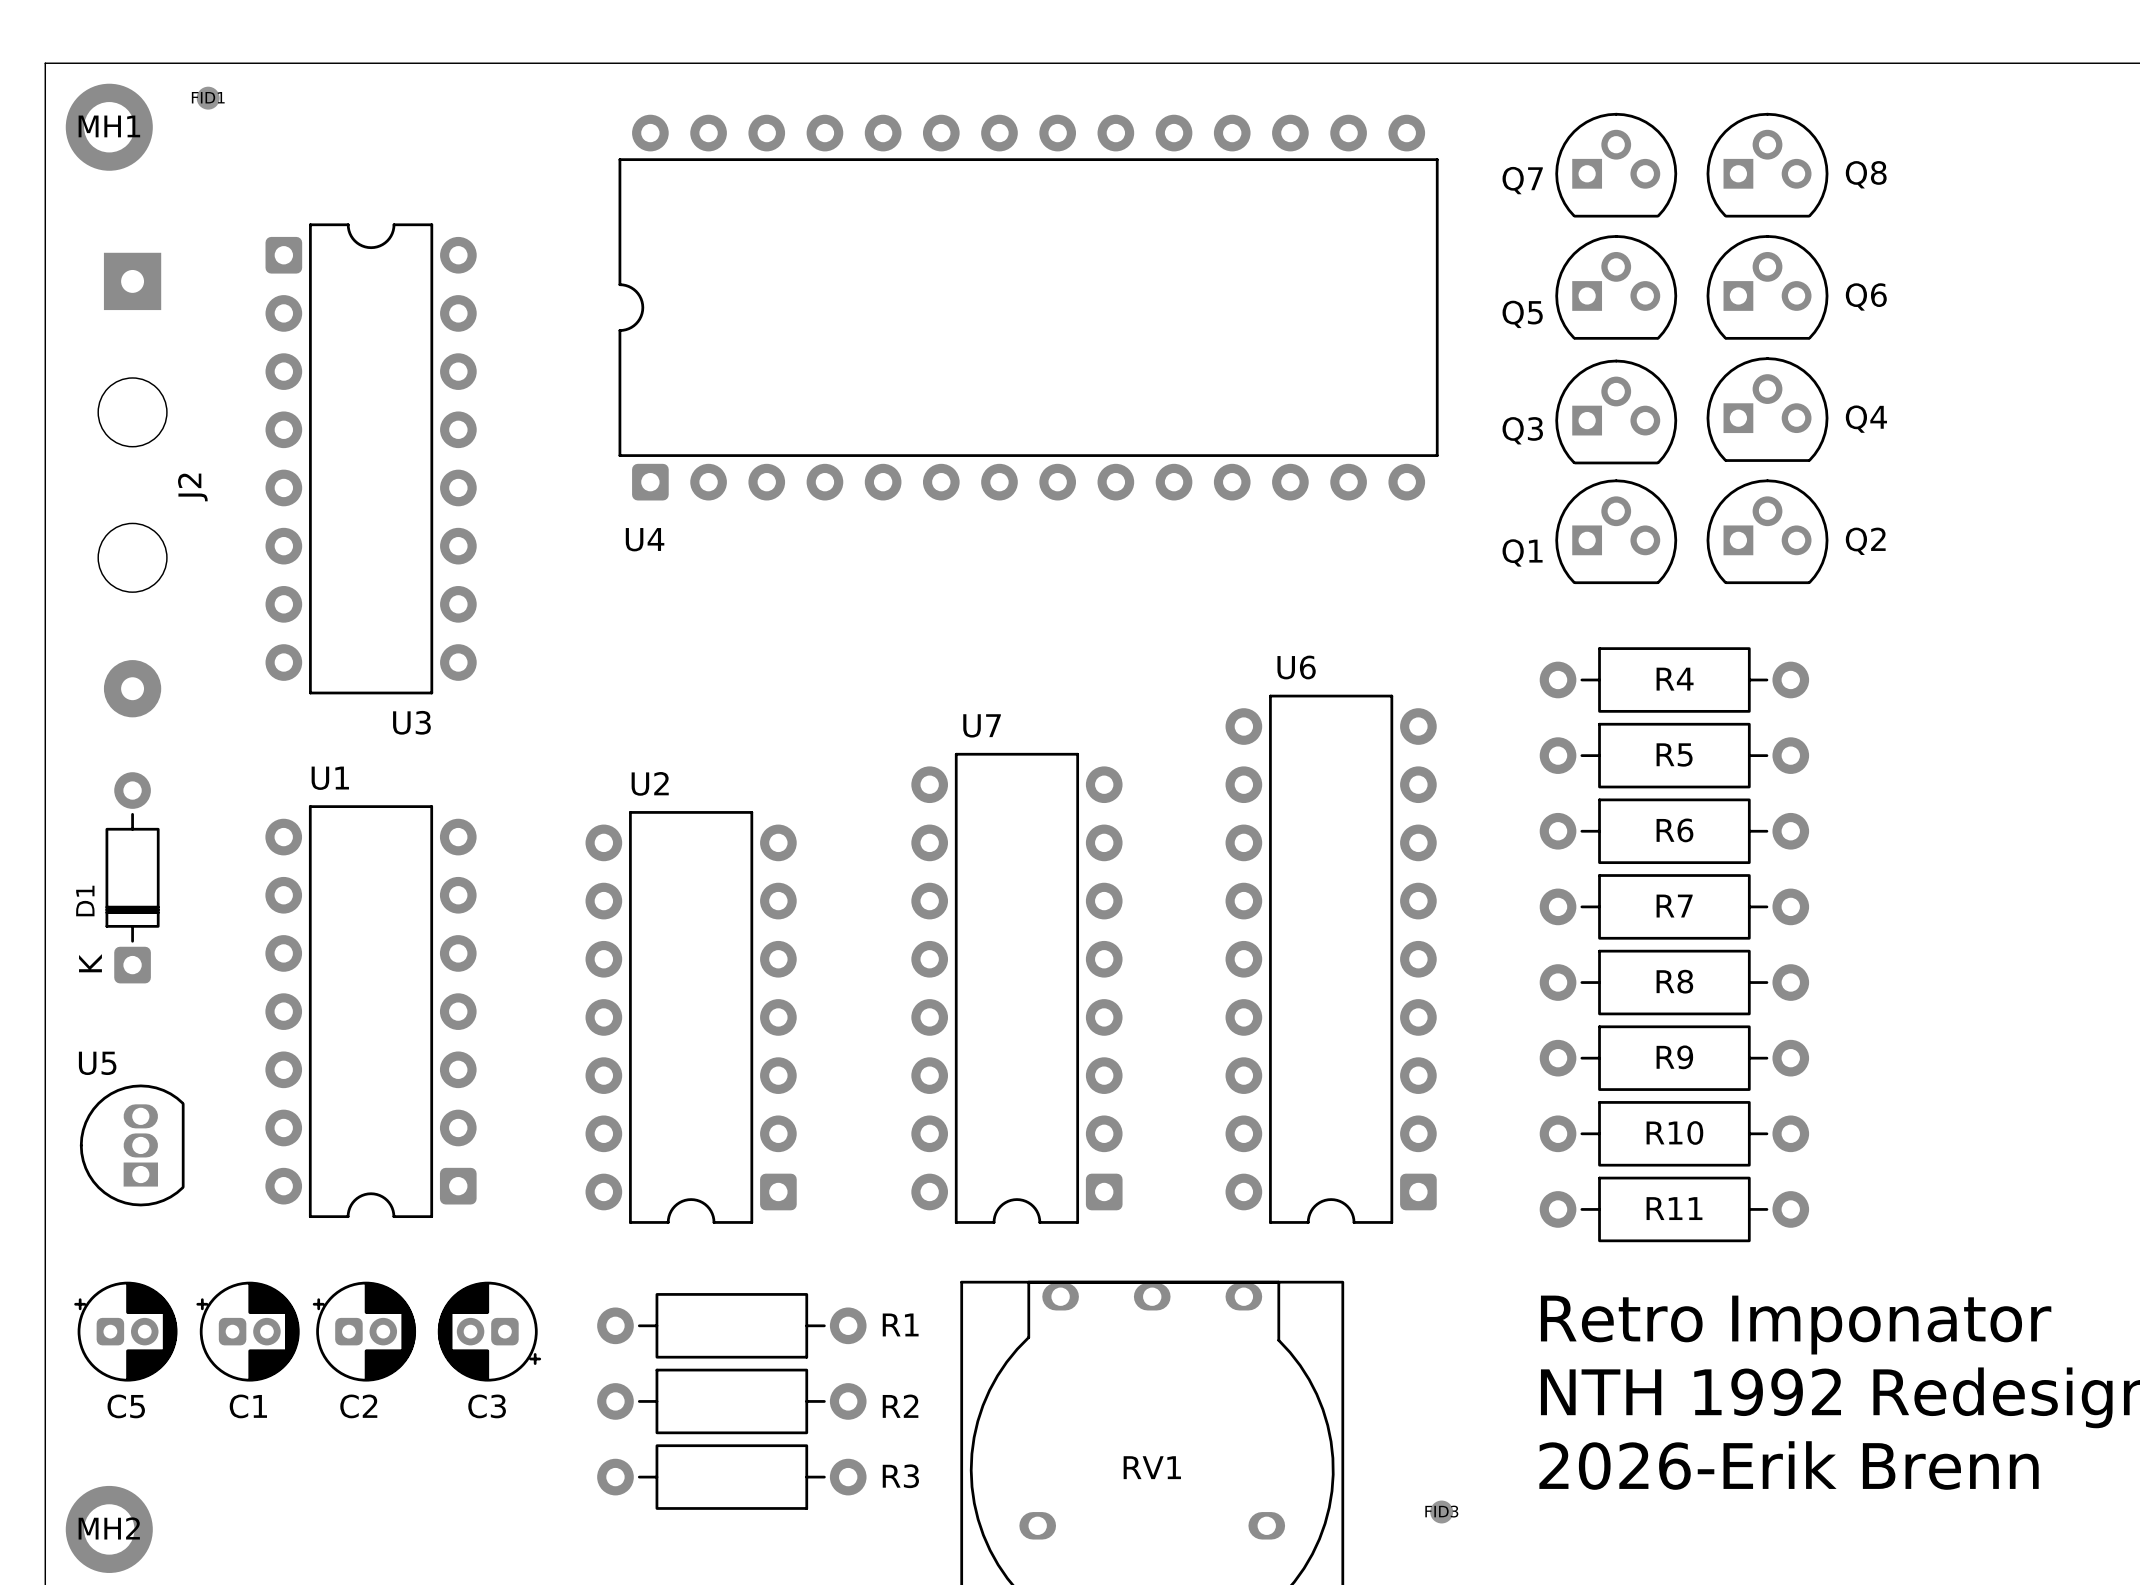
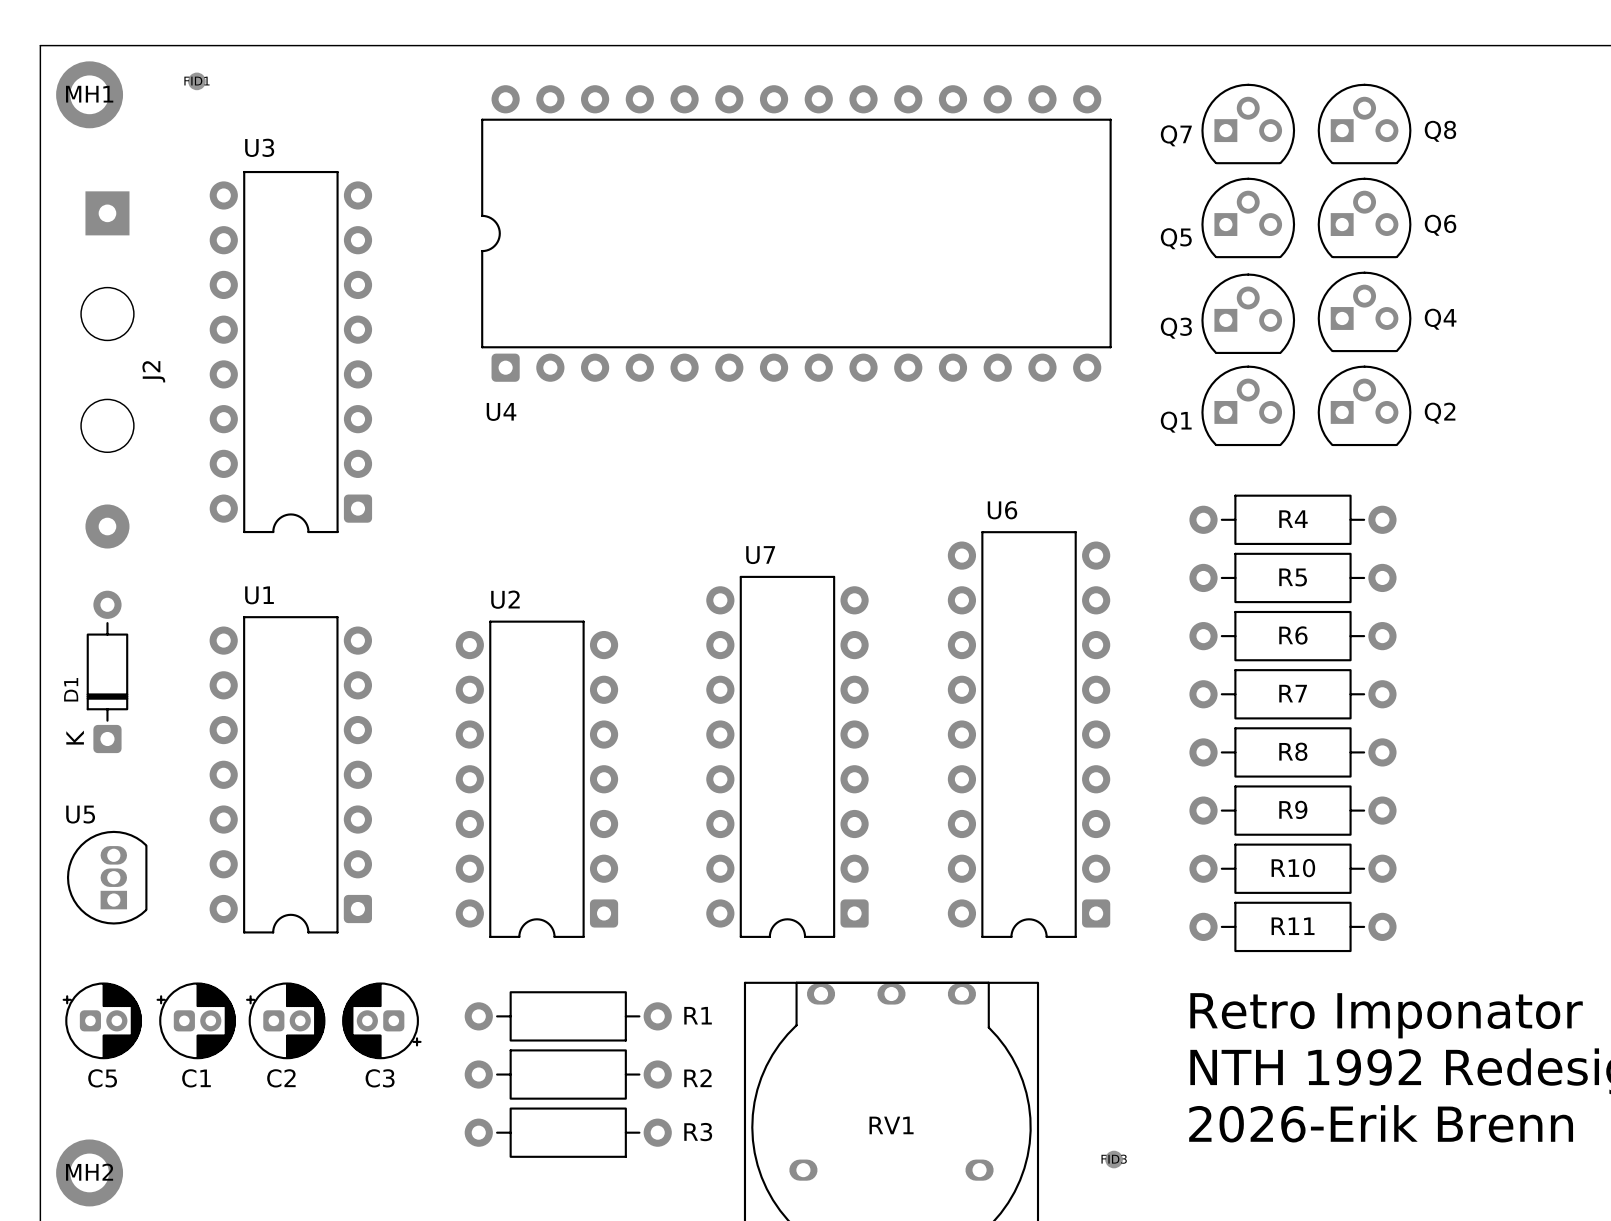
FID1 position: (208, 98) -> (196, 81)
U3 rotation: 0° (371, 458) -> 180° (290, 352)

